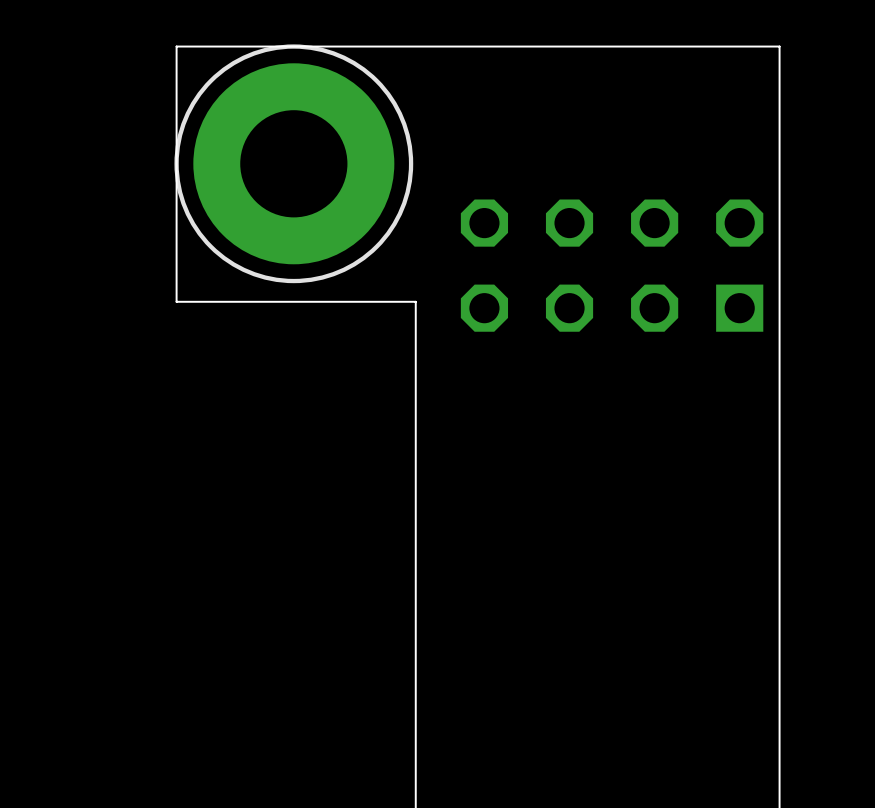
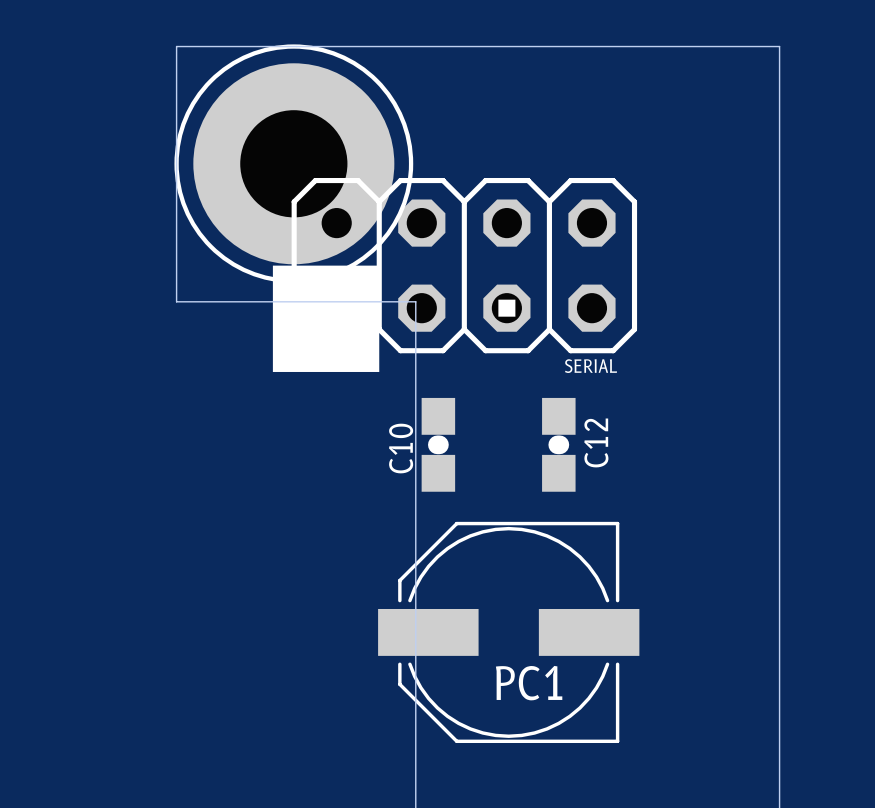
SERIAL side: bottom (612, 265) -> top (454, 274)
C10: none -> (438, 444)
C12: none -> (558, 444)
PC1: none -> (508, 632)

